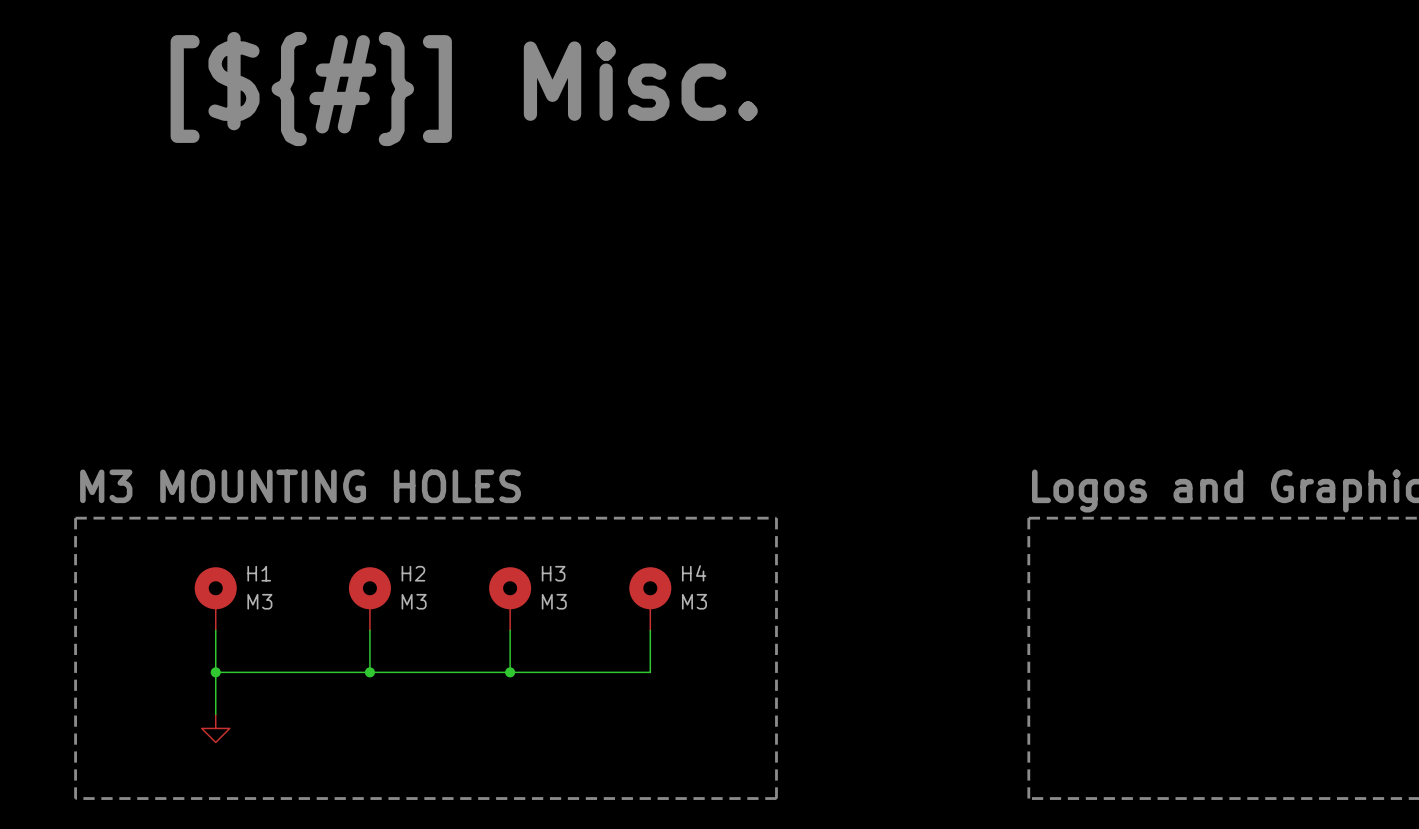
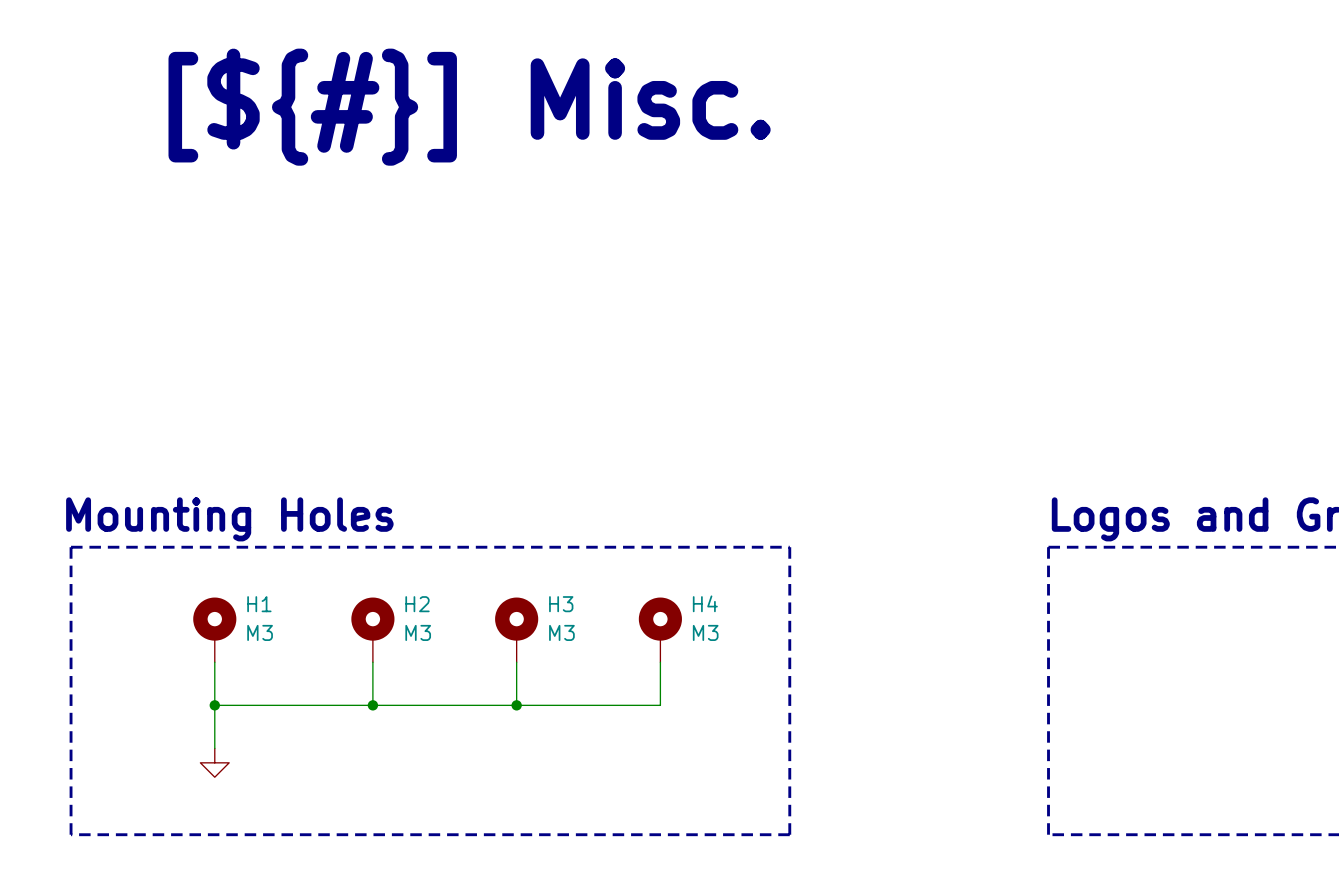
text: M3 MOUNTING HOLES (300, 486) -> none
text: none -> Mounting Holes (229, 519)

